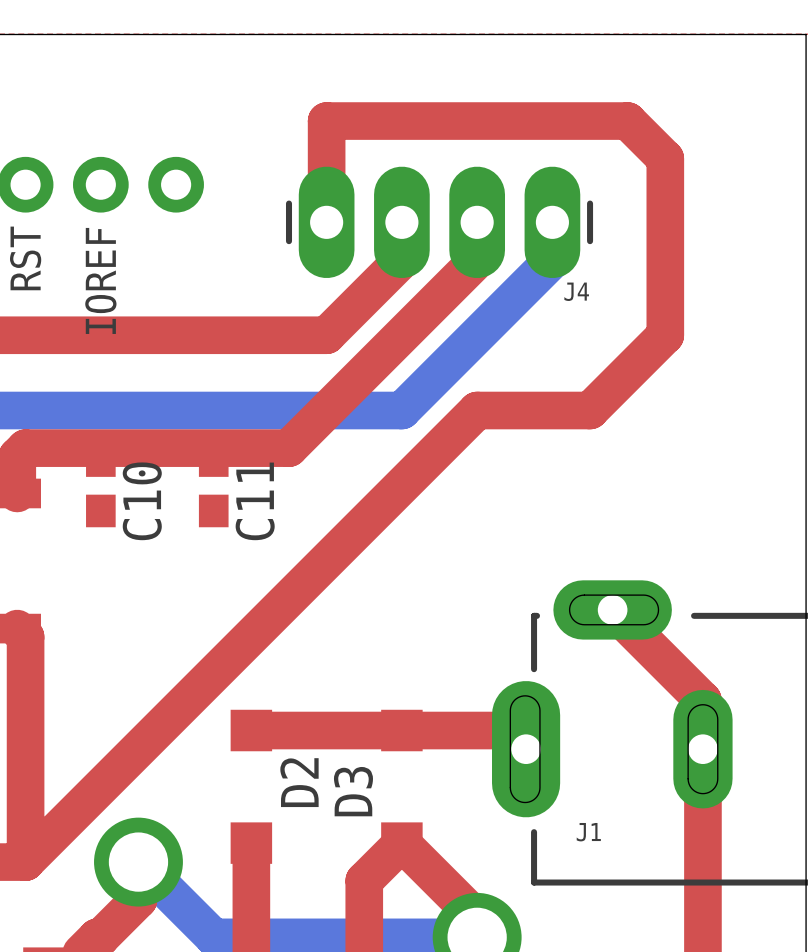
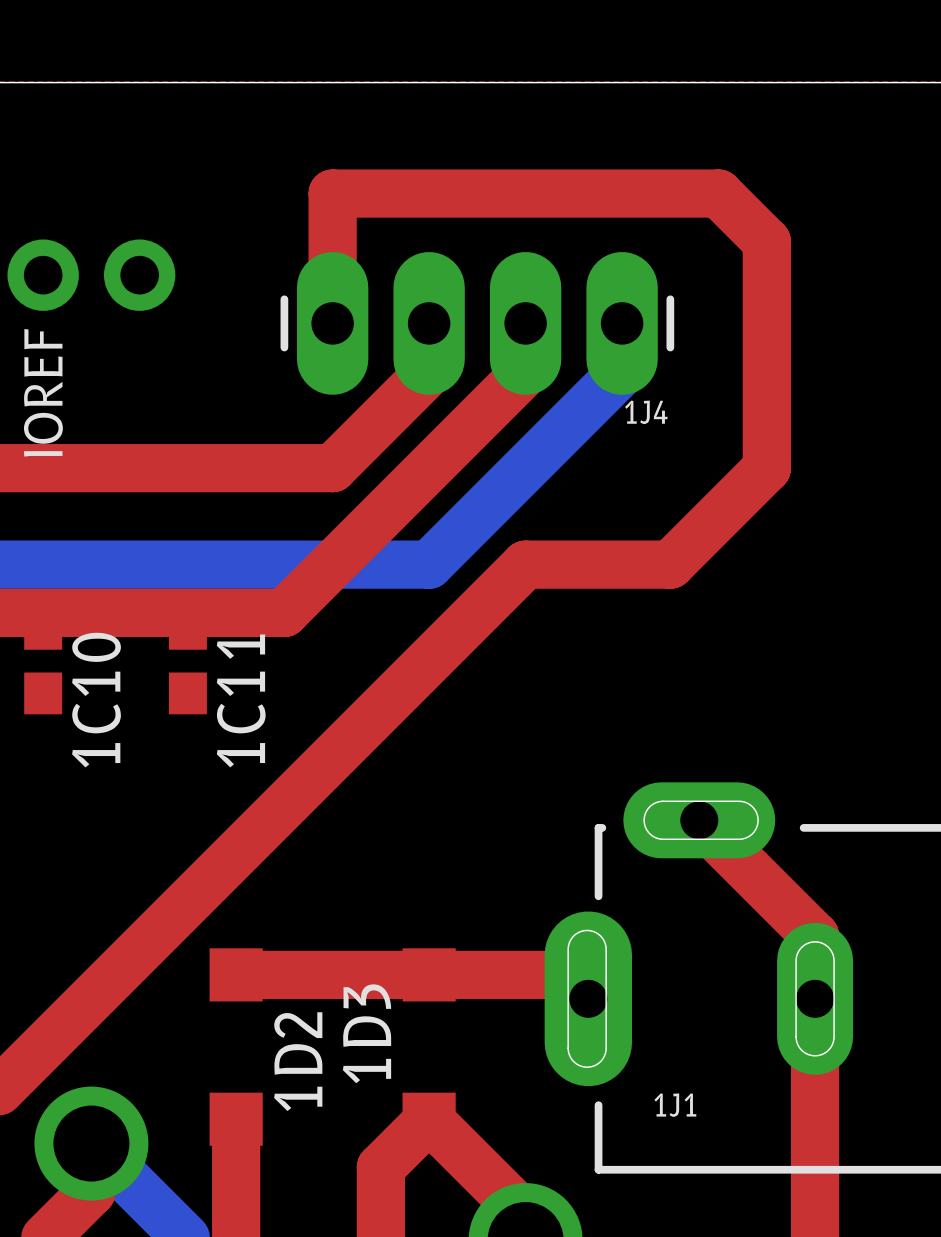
J4 name: J4 (576, 291) -> 1J4 (646, 412)
C10 name: C10 (142, 501) -> 1C10 (96, 700)
C11 name: C11 (255, 501) -> 1C11 (241, 700)
D2 name: D2 (299, 782) -> 1D2 (298, 1061)
D3 name: D3 (353, 791) -> 1D3 (367, 1033)
J1 name: J1 (588, 832) -> 1J1 (675, 1105)

